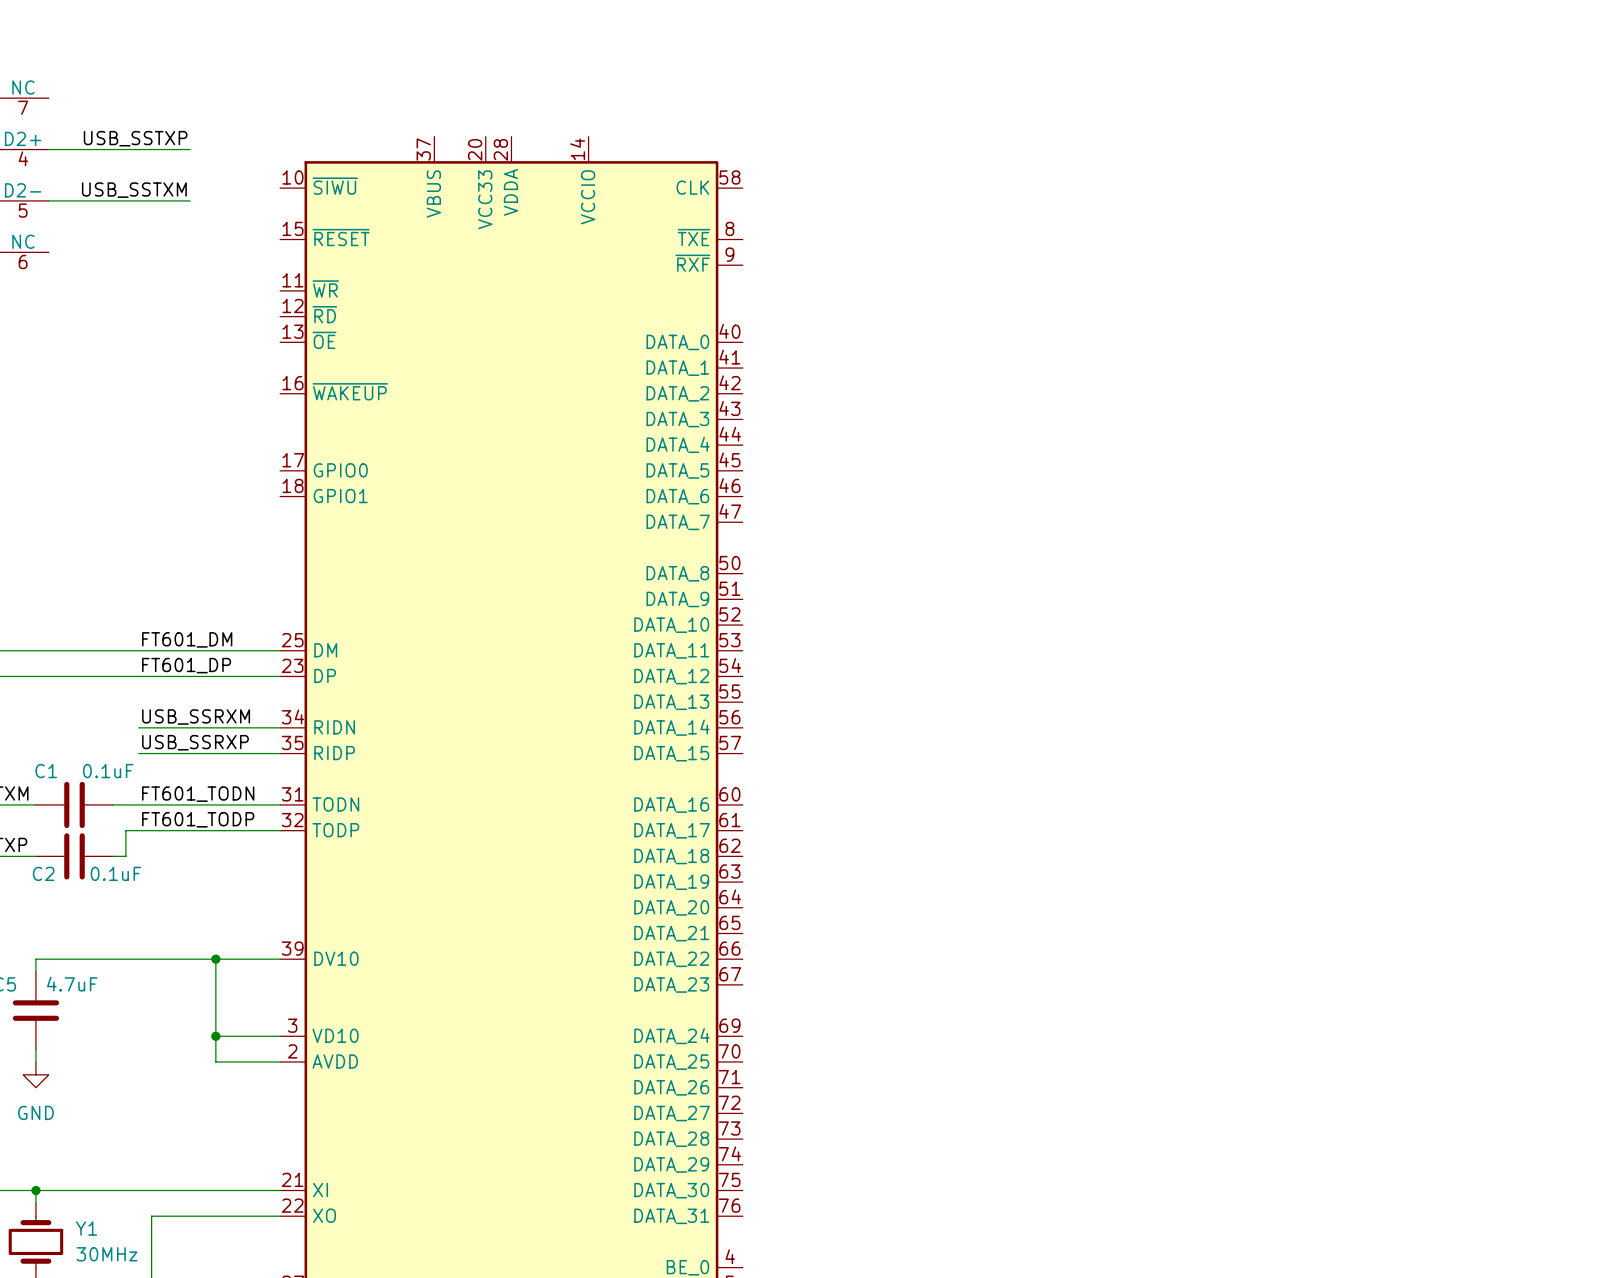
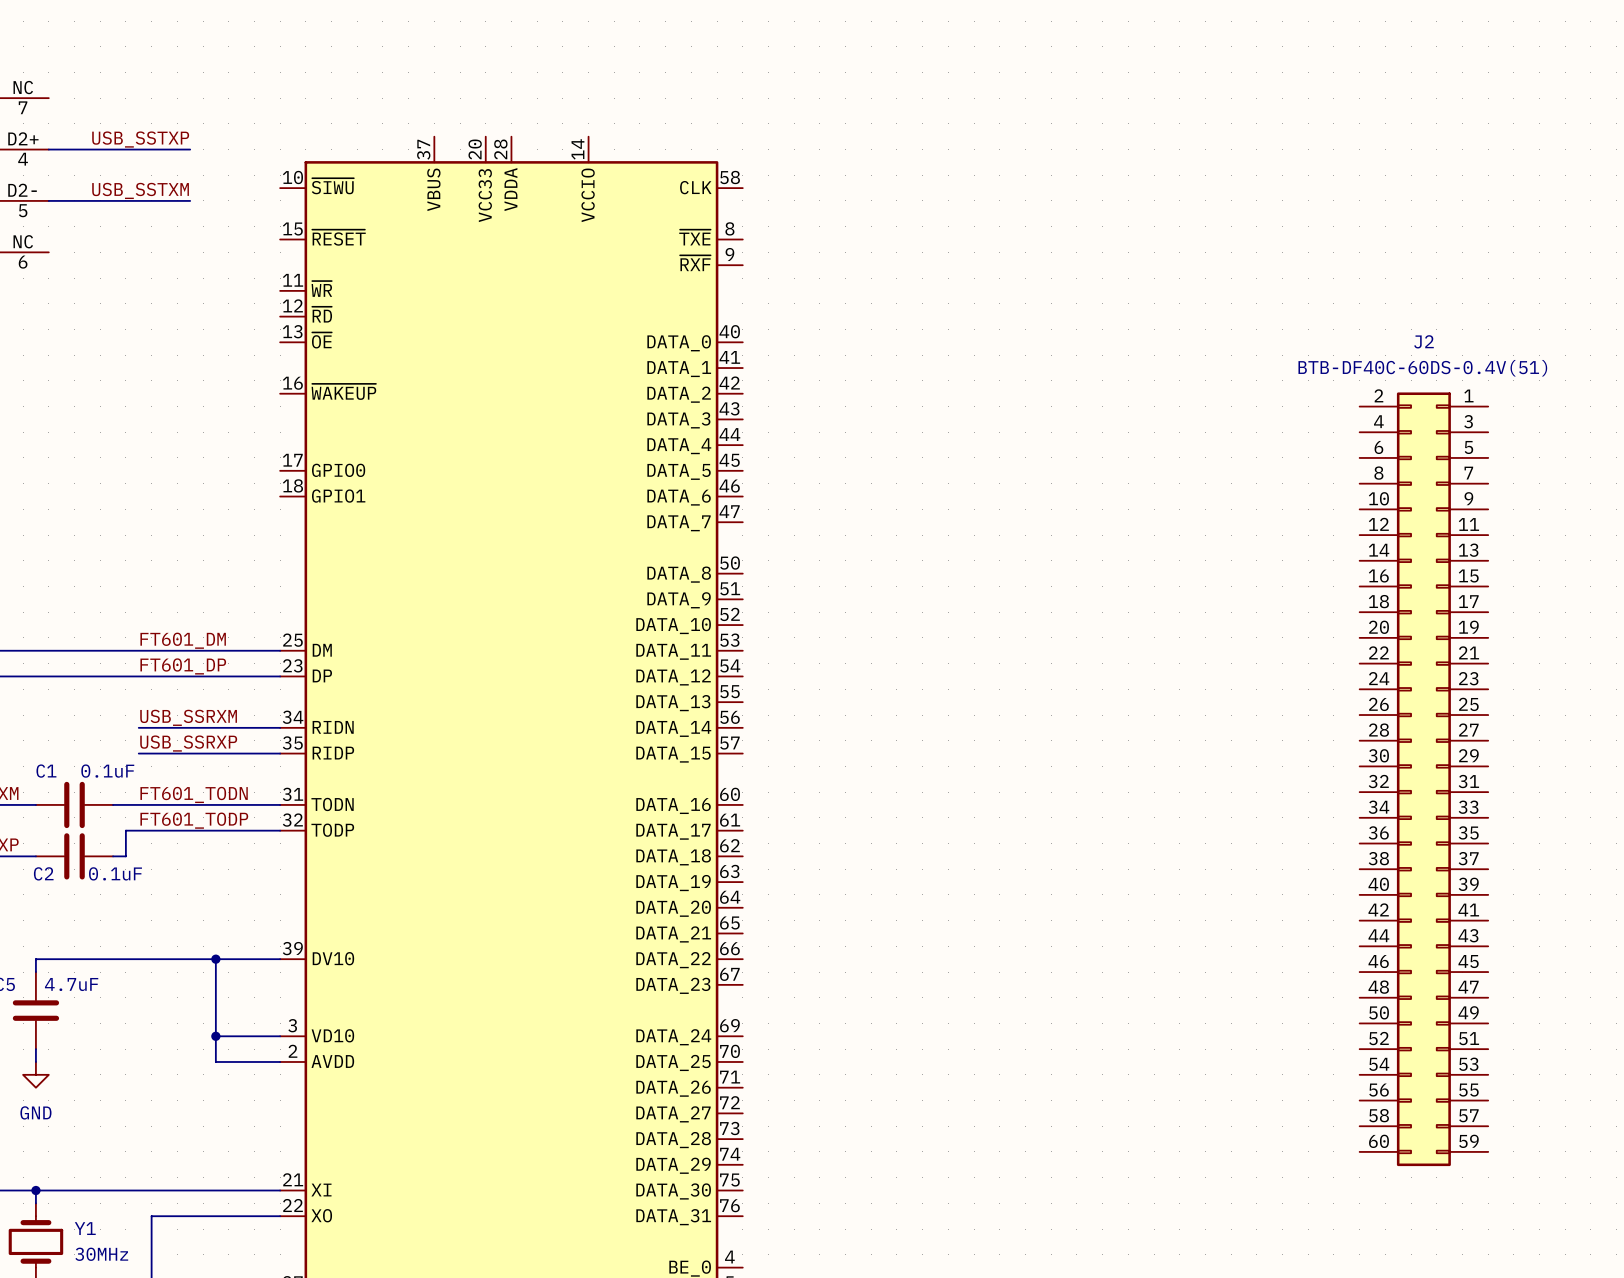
J2: none -> BTB-DF40C-60DS-0.4V(51) (1423, 779)

